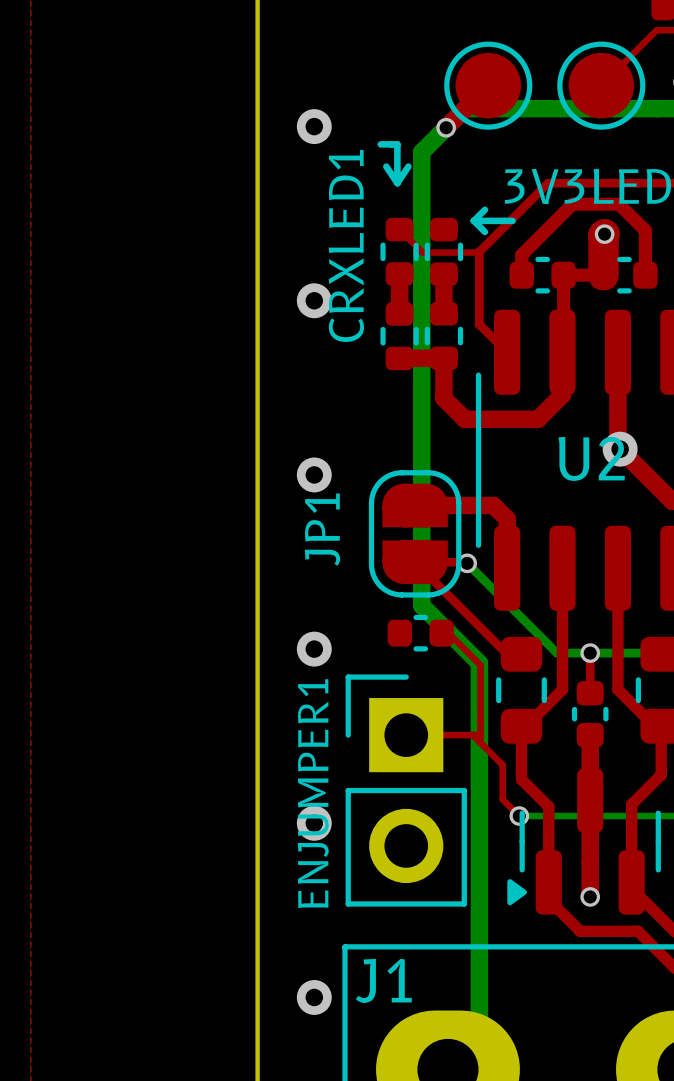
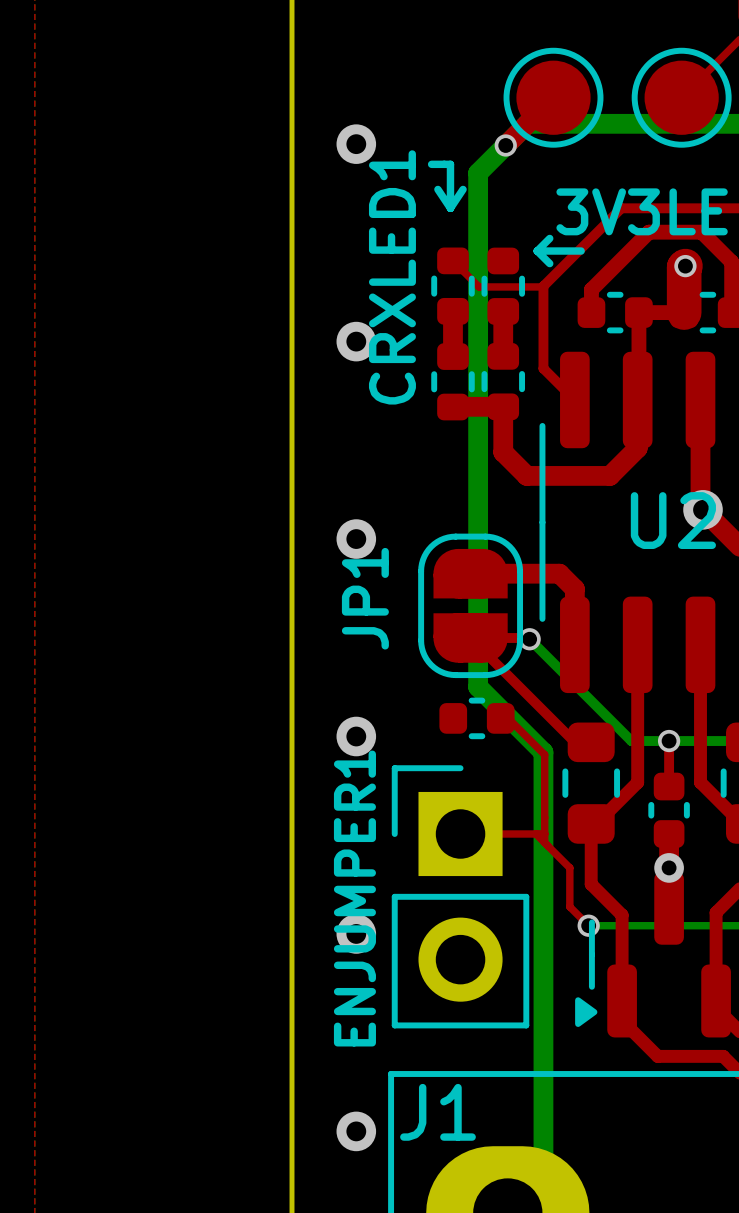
via: none -> (669, 867)
top track: (590, 800) (590, 896) -> none
via: (590, 896) -> none

